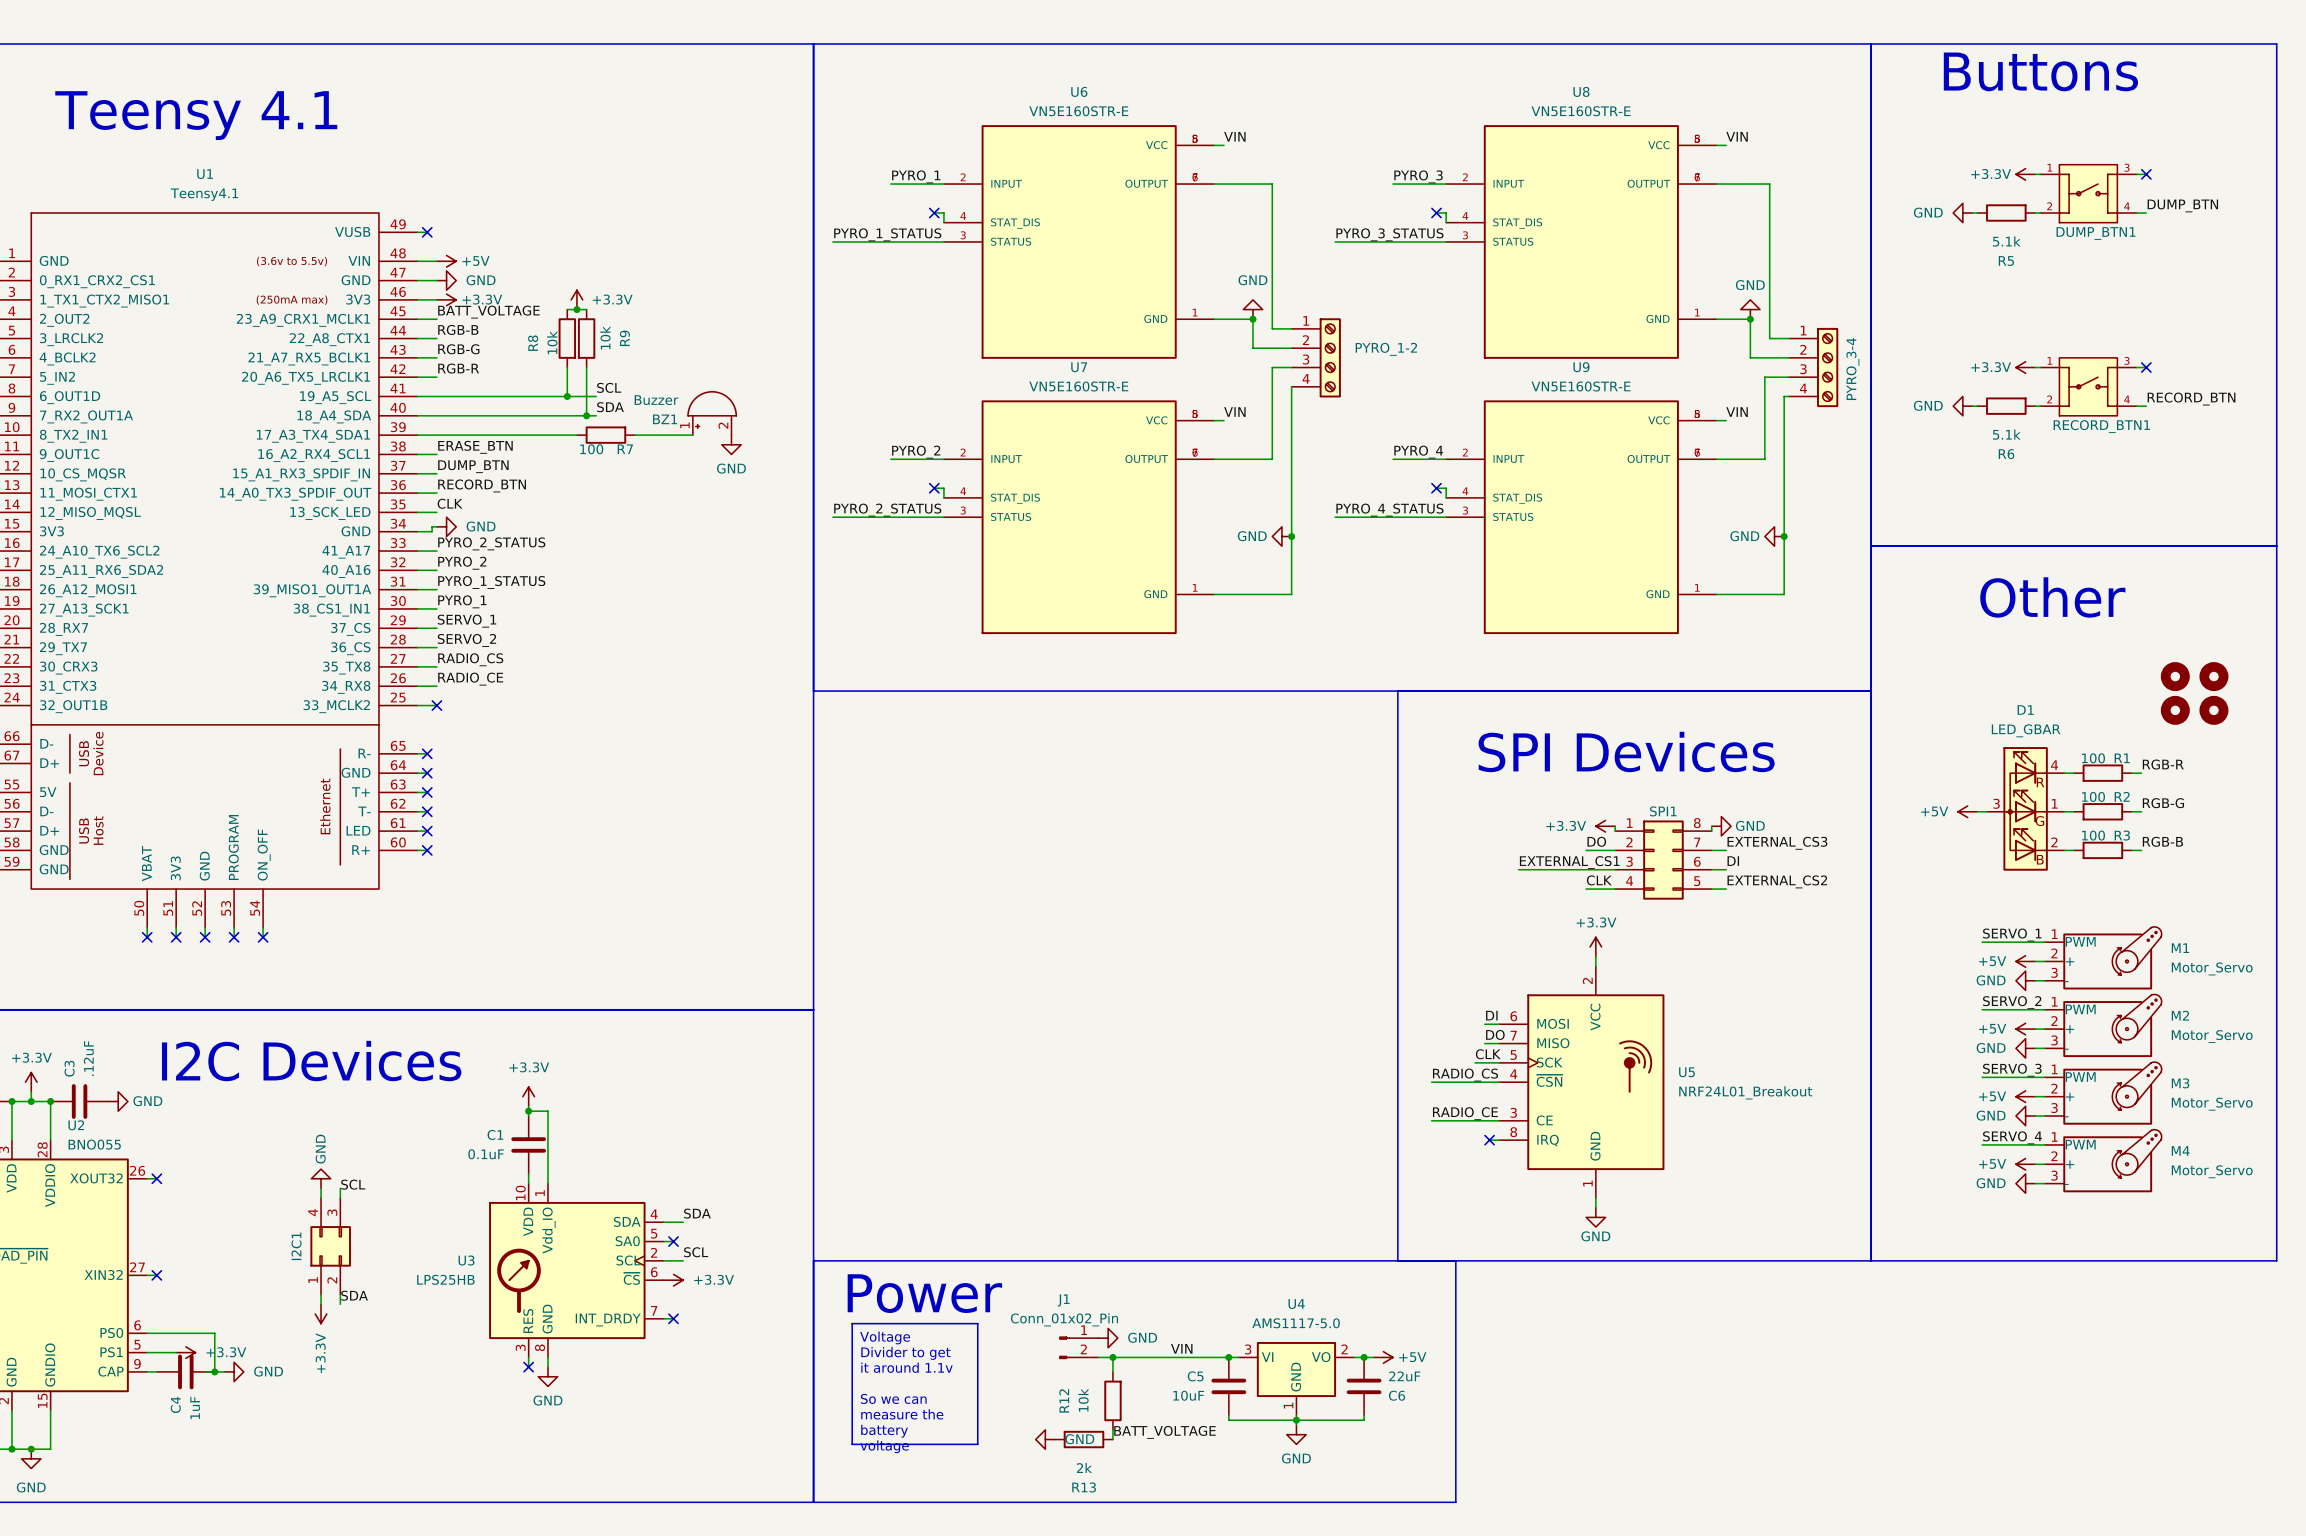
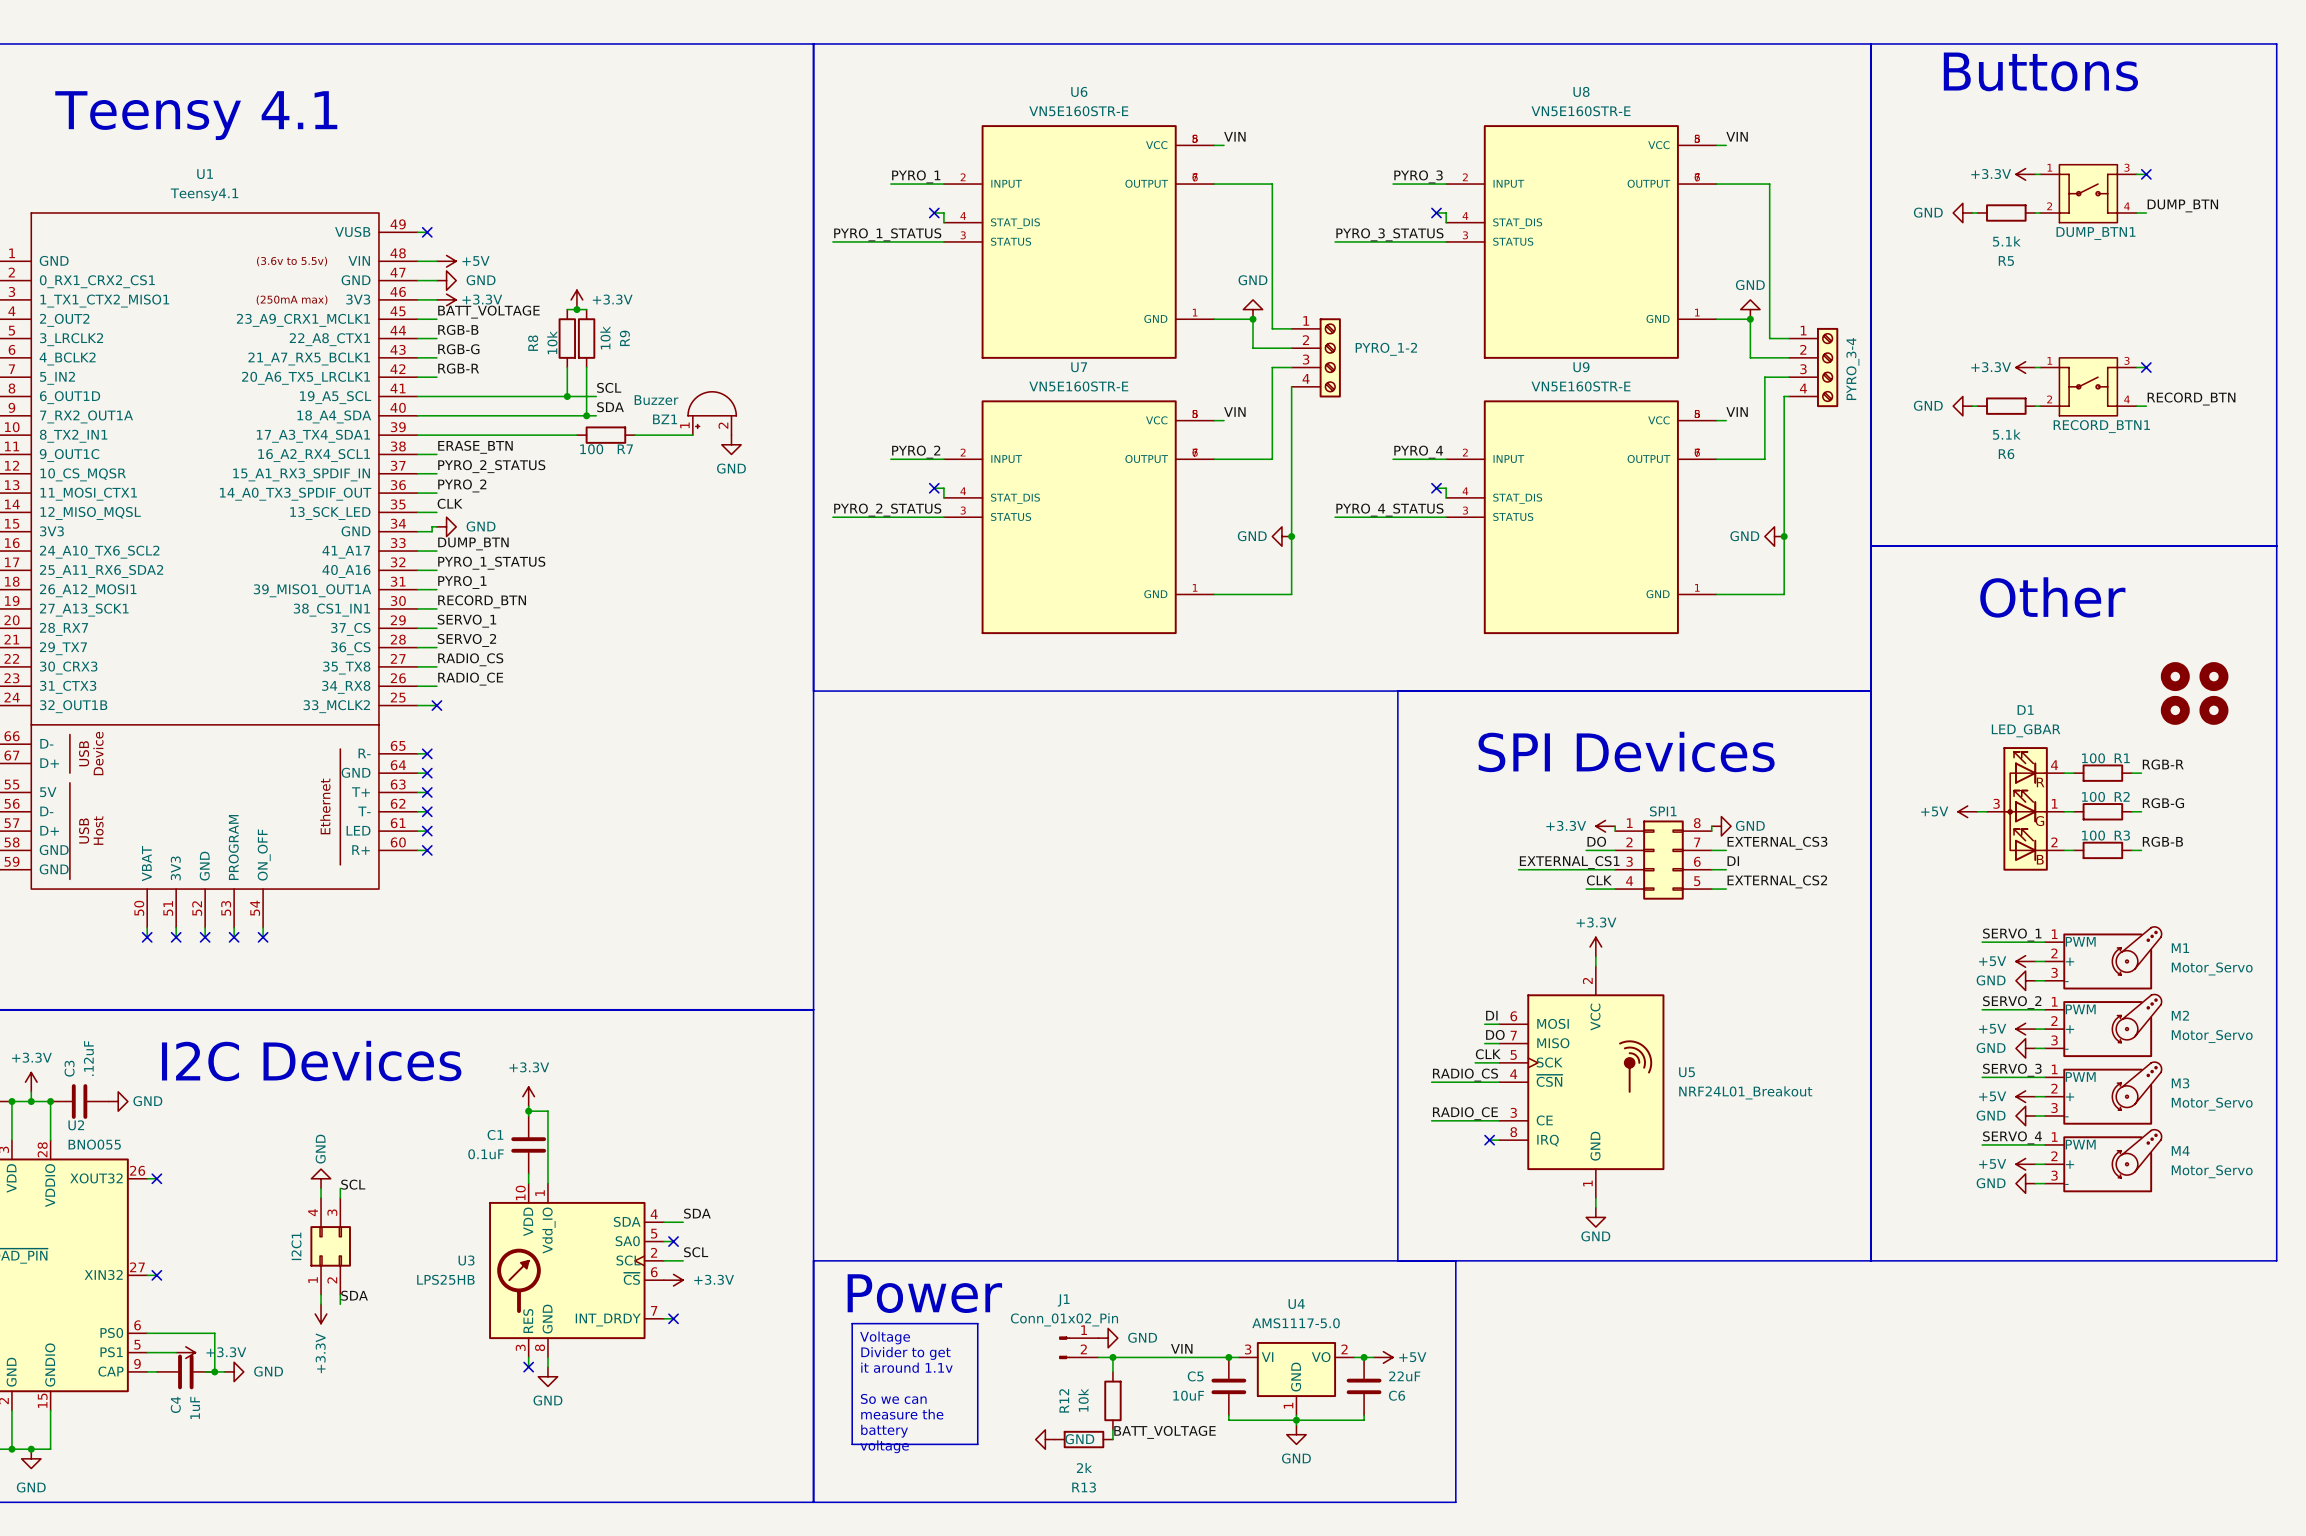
label: DUMP_BTN (473, 466) -> PYRO_2_STATUS (491, 466)
label: RECORD_BTN (482, 485) -> PYRO_2 (462, 485)
label: PYRO_2_STATUS (491, 543) -> DUMP_BTN (473, 543)
label: PYRO_2 (462, 563) -> PYRO_1_STATUS (491, 563)
label: PYRO_1_STATUS (491, 582) -> PYRO_1 (462, 582)
label: PYRO_1 (462, 601) -> RECORD_BTN (482, 601)

